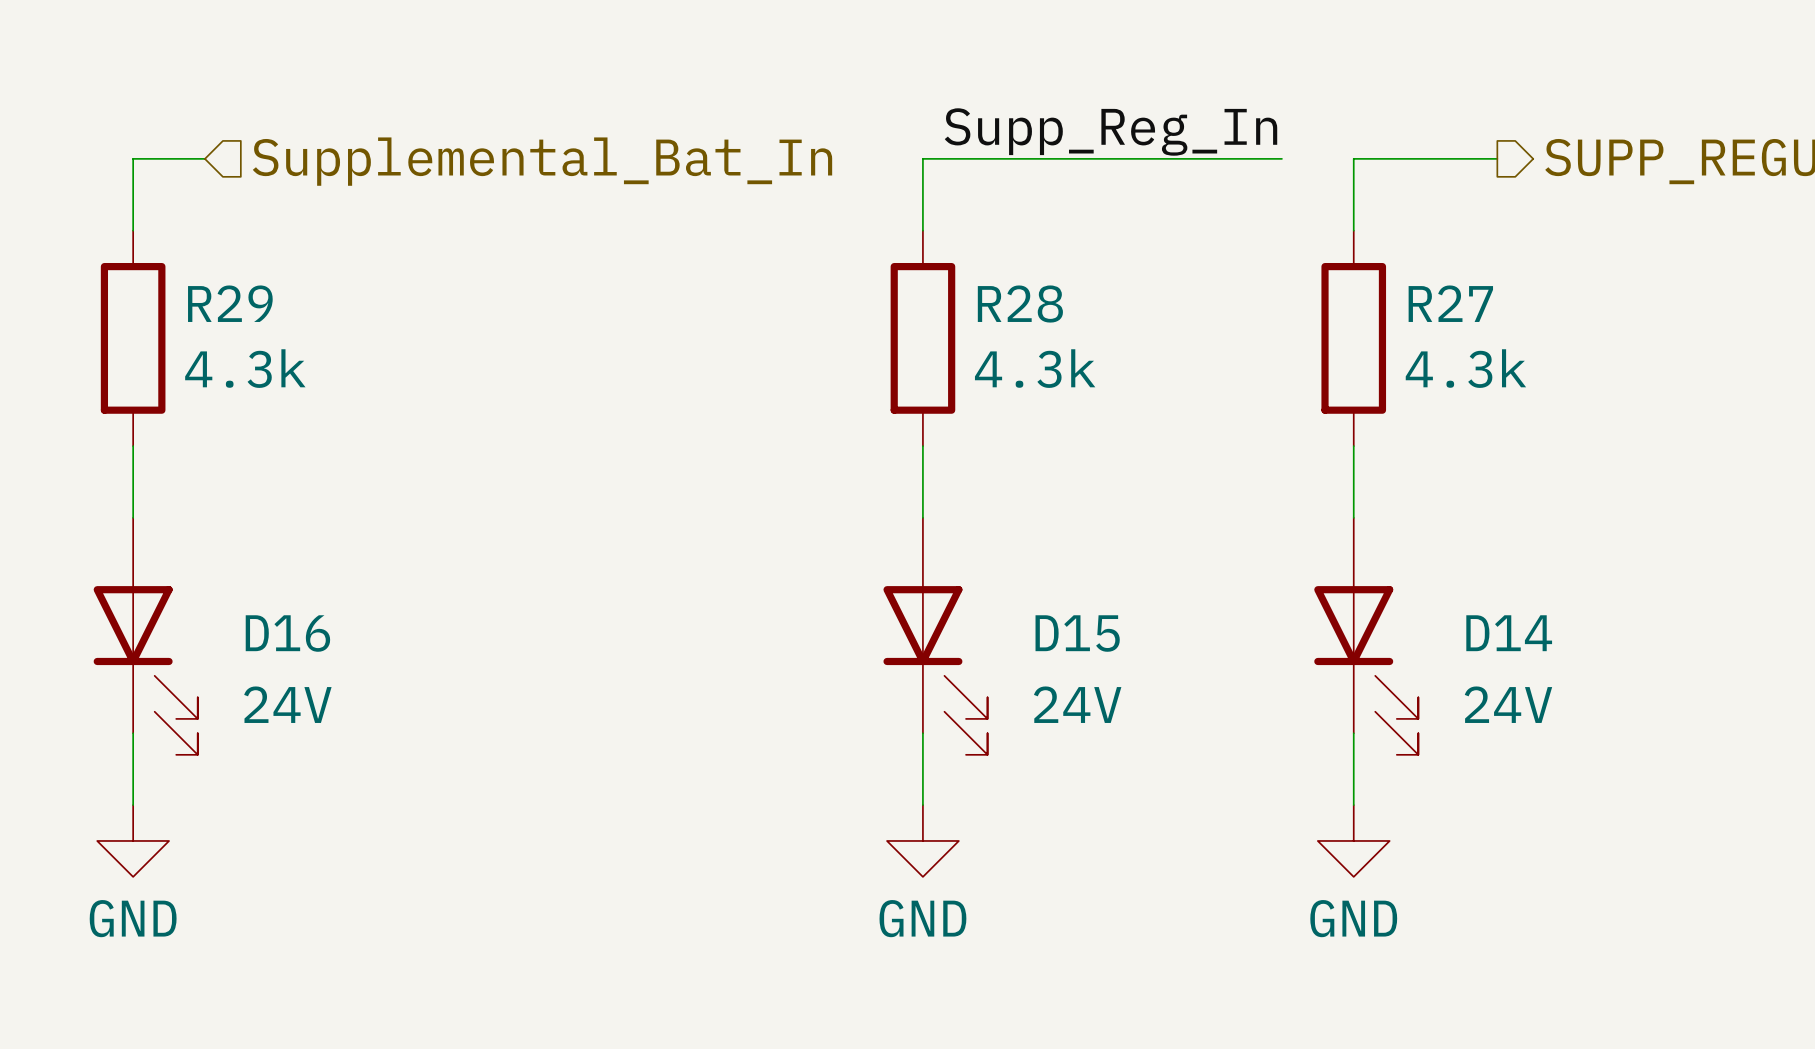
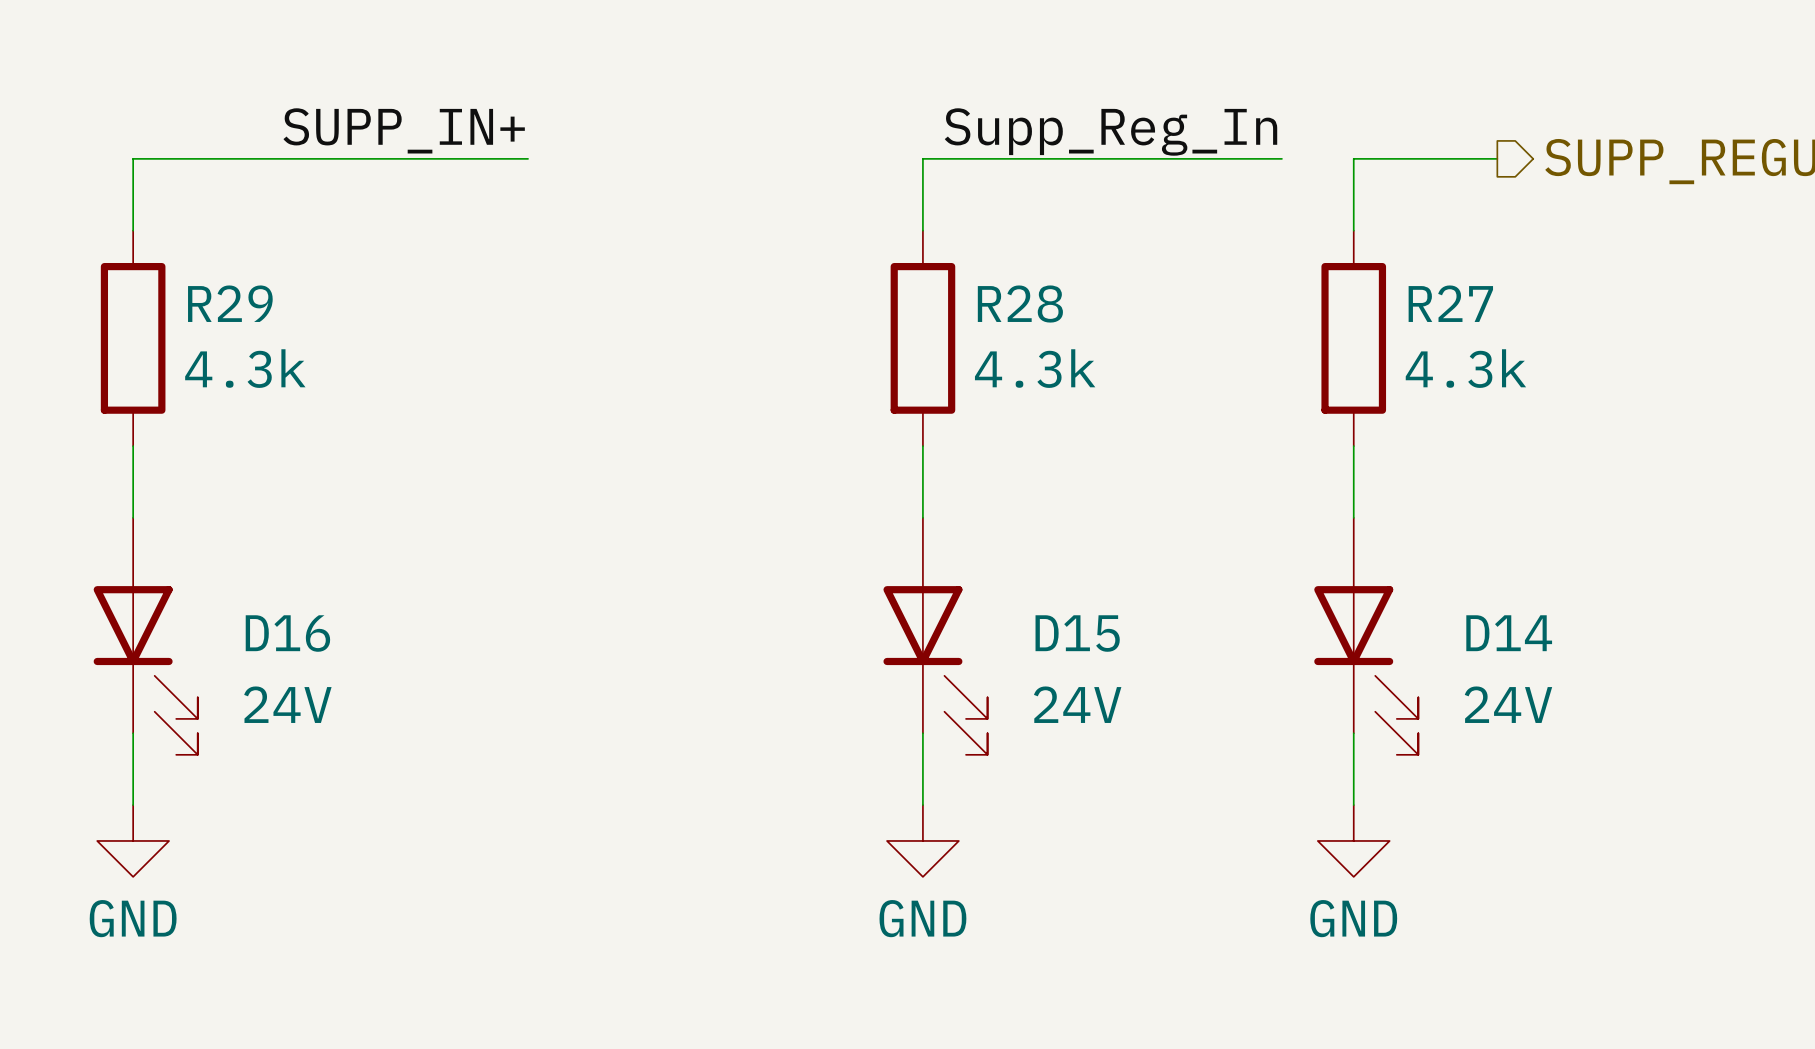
label: none -> SUPP_IN+ (404, 130)
wire: none -> (204, 158) (528, 158)
hierarchical label: Supplemental_Bat_In (542, 161) -> none

